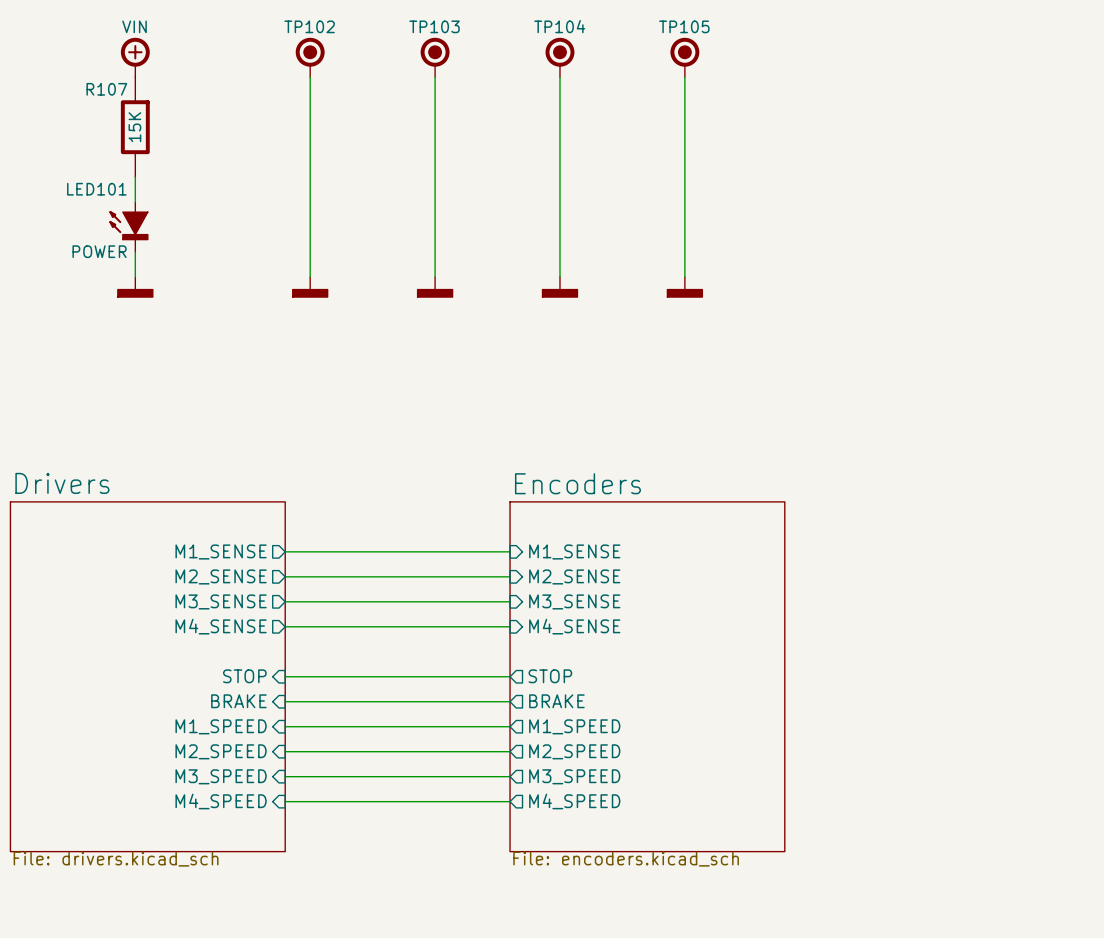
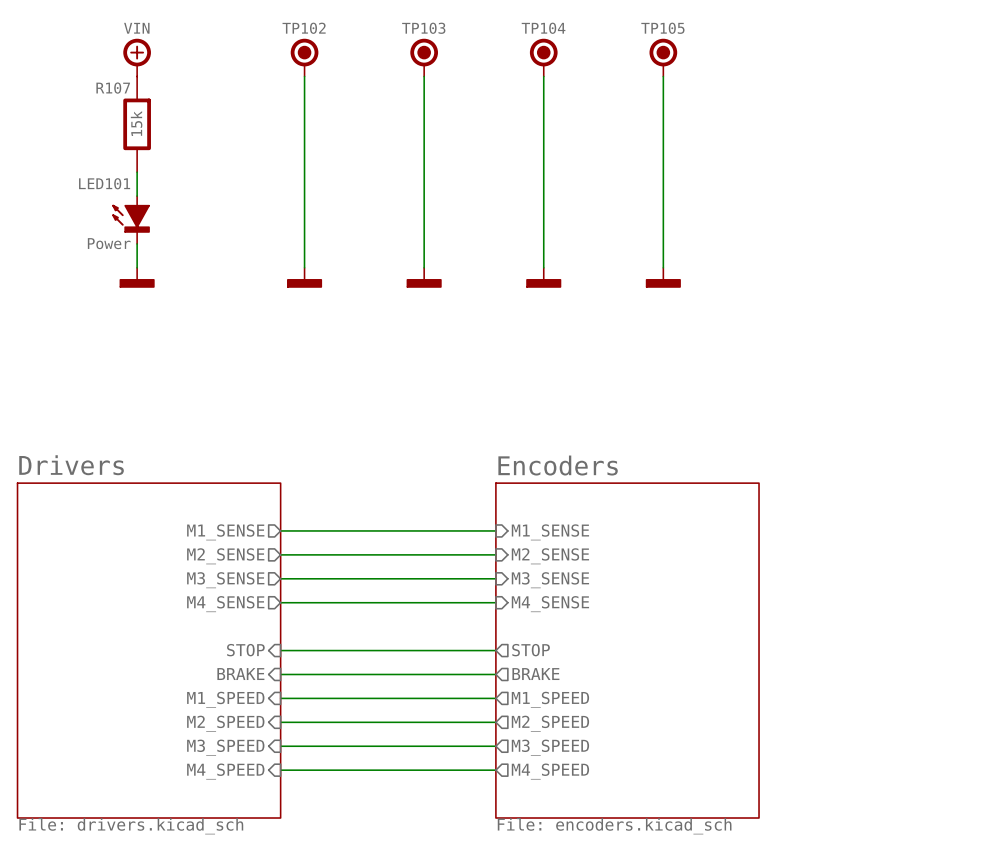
R107 value: 15K (134, 127) -> 15k (136, 123)
LED101 value: POWER (99, 251) -> Power (109, 243)

